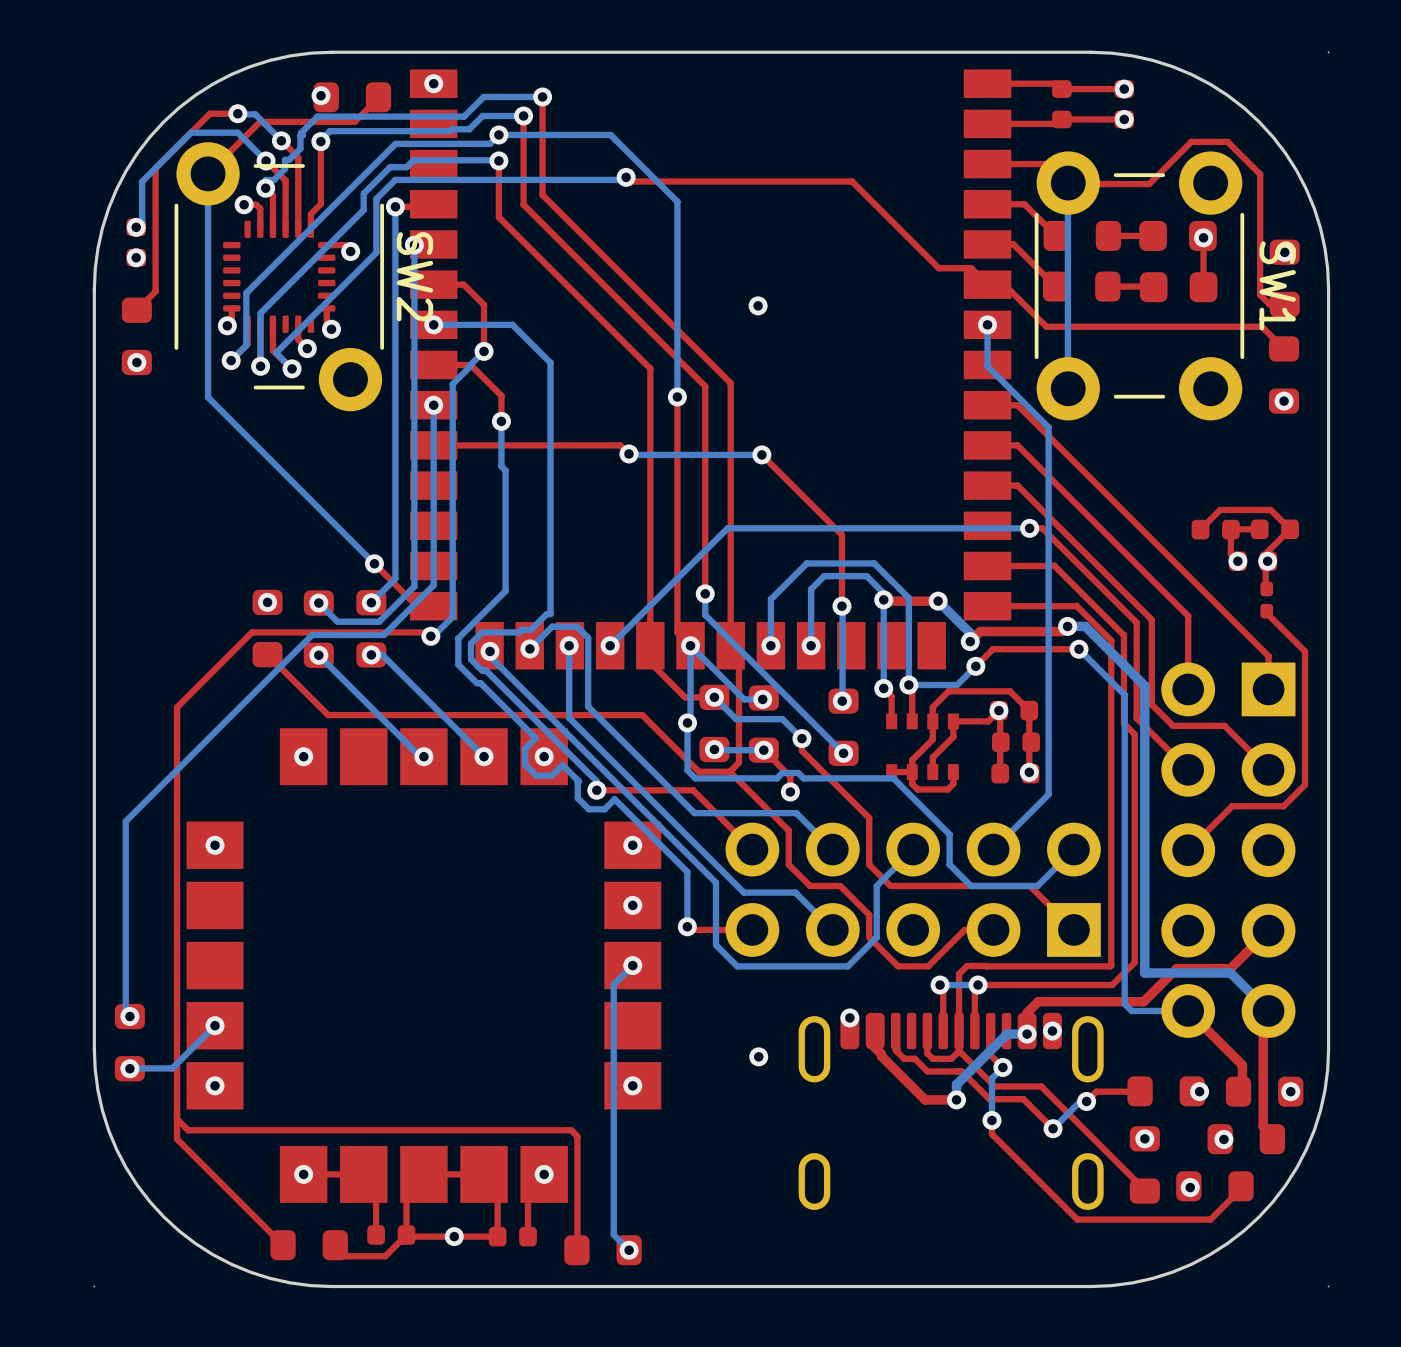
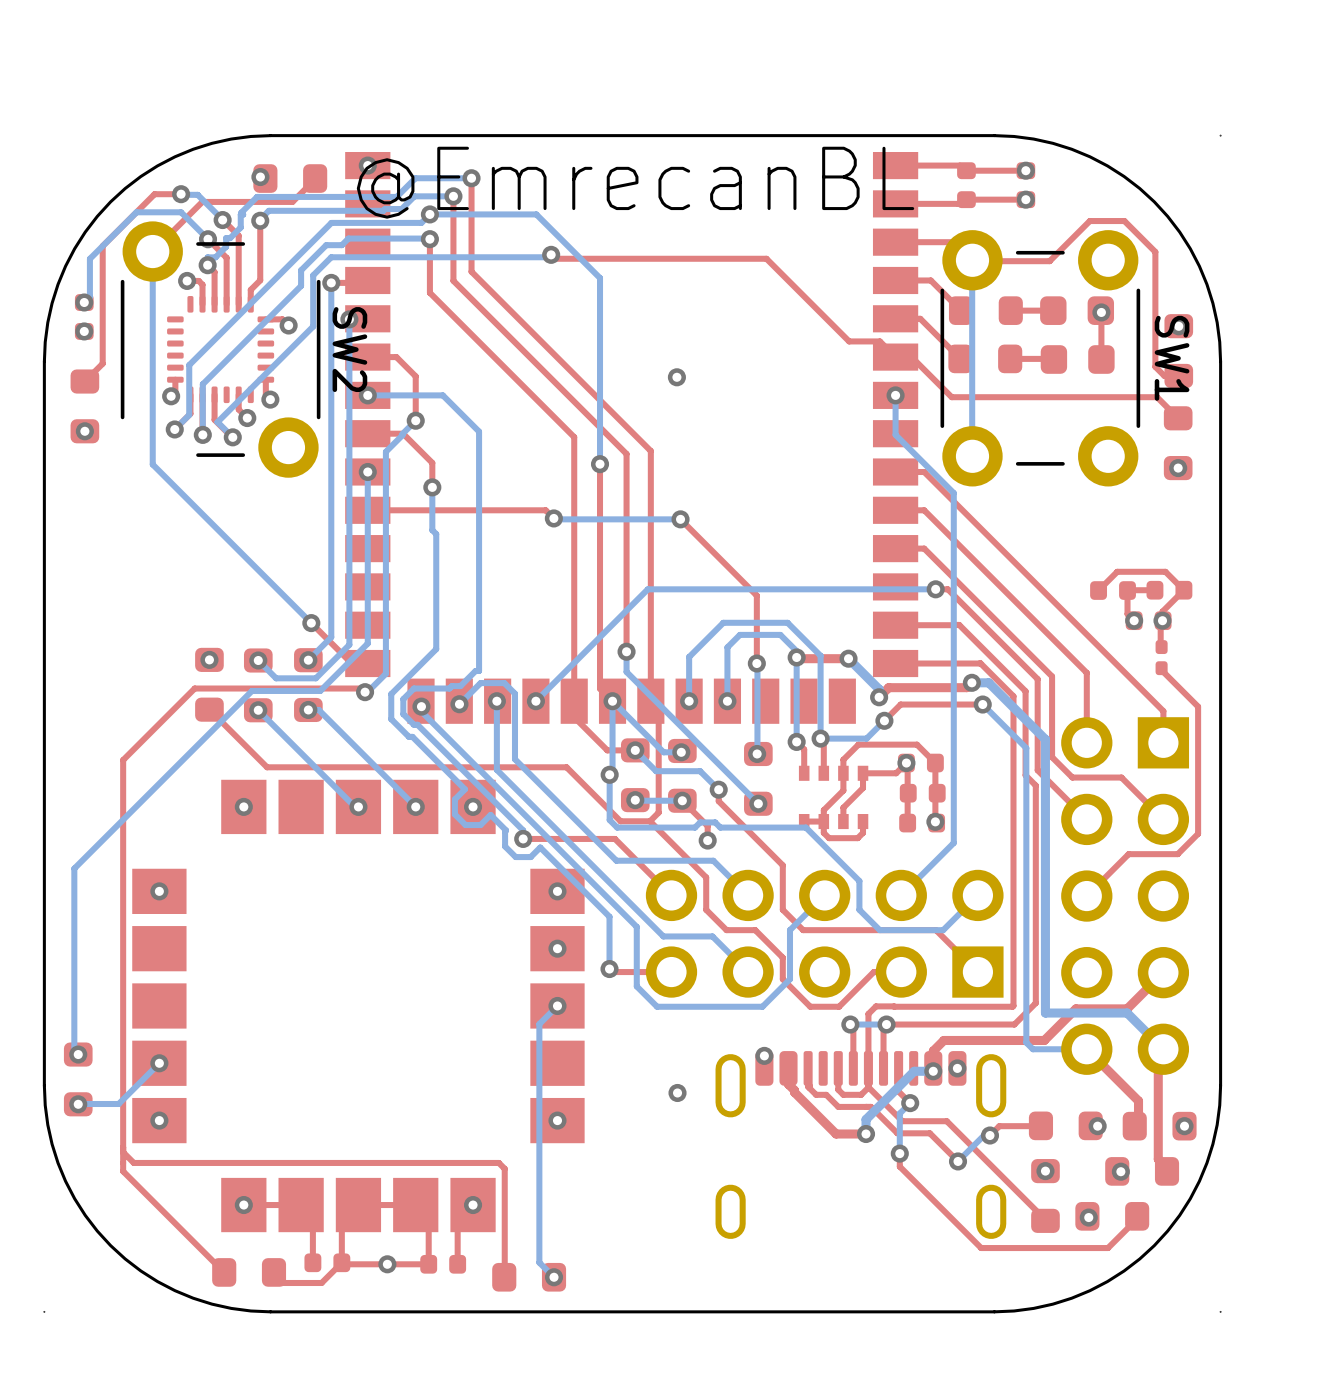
text: none -> @EmrecanBL (635, 182)

